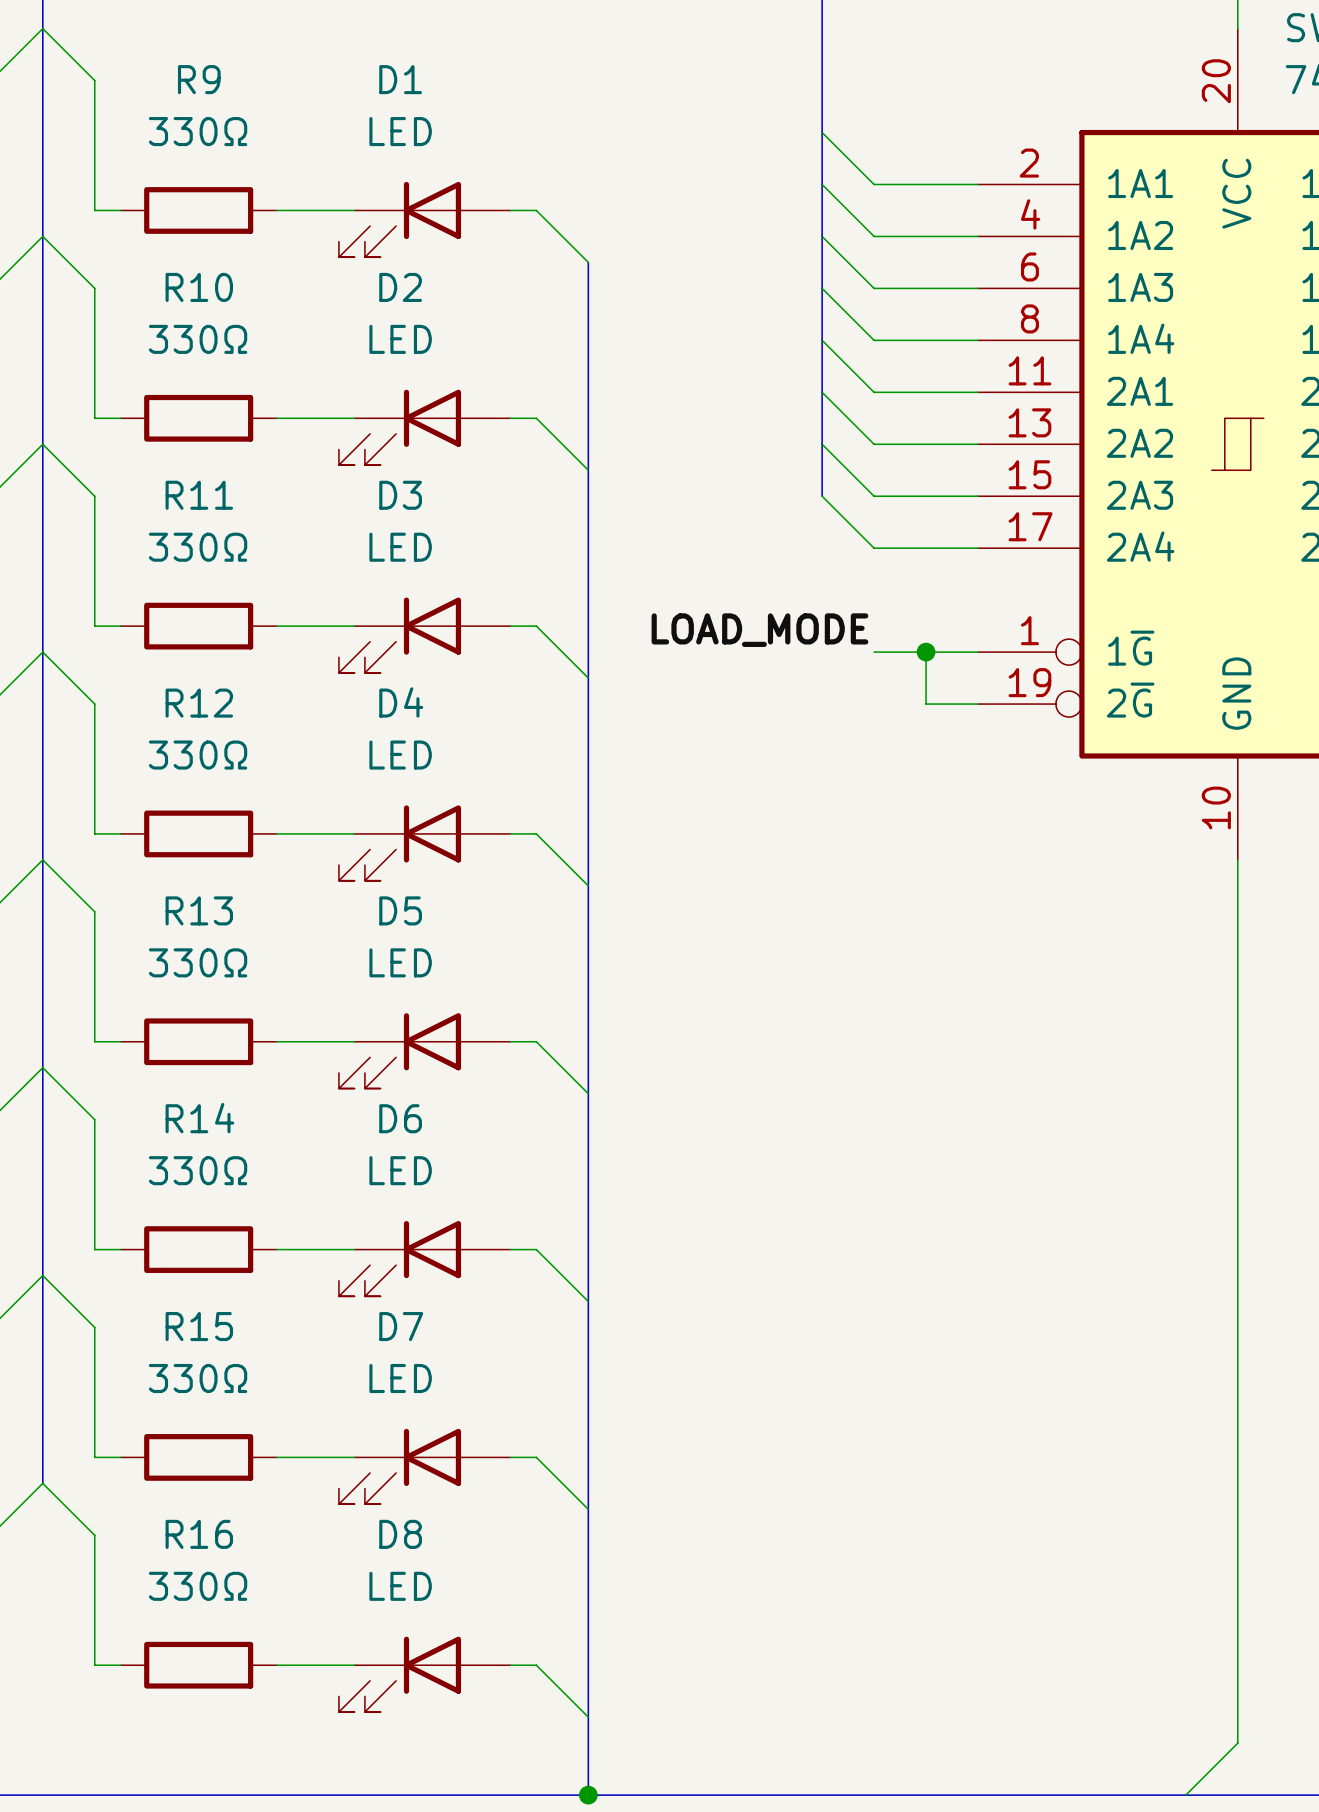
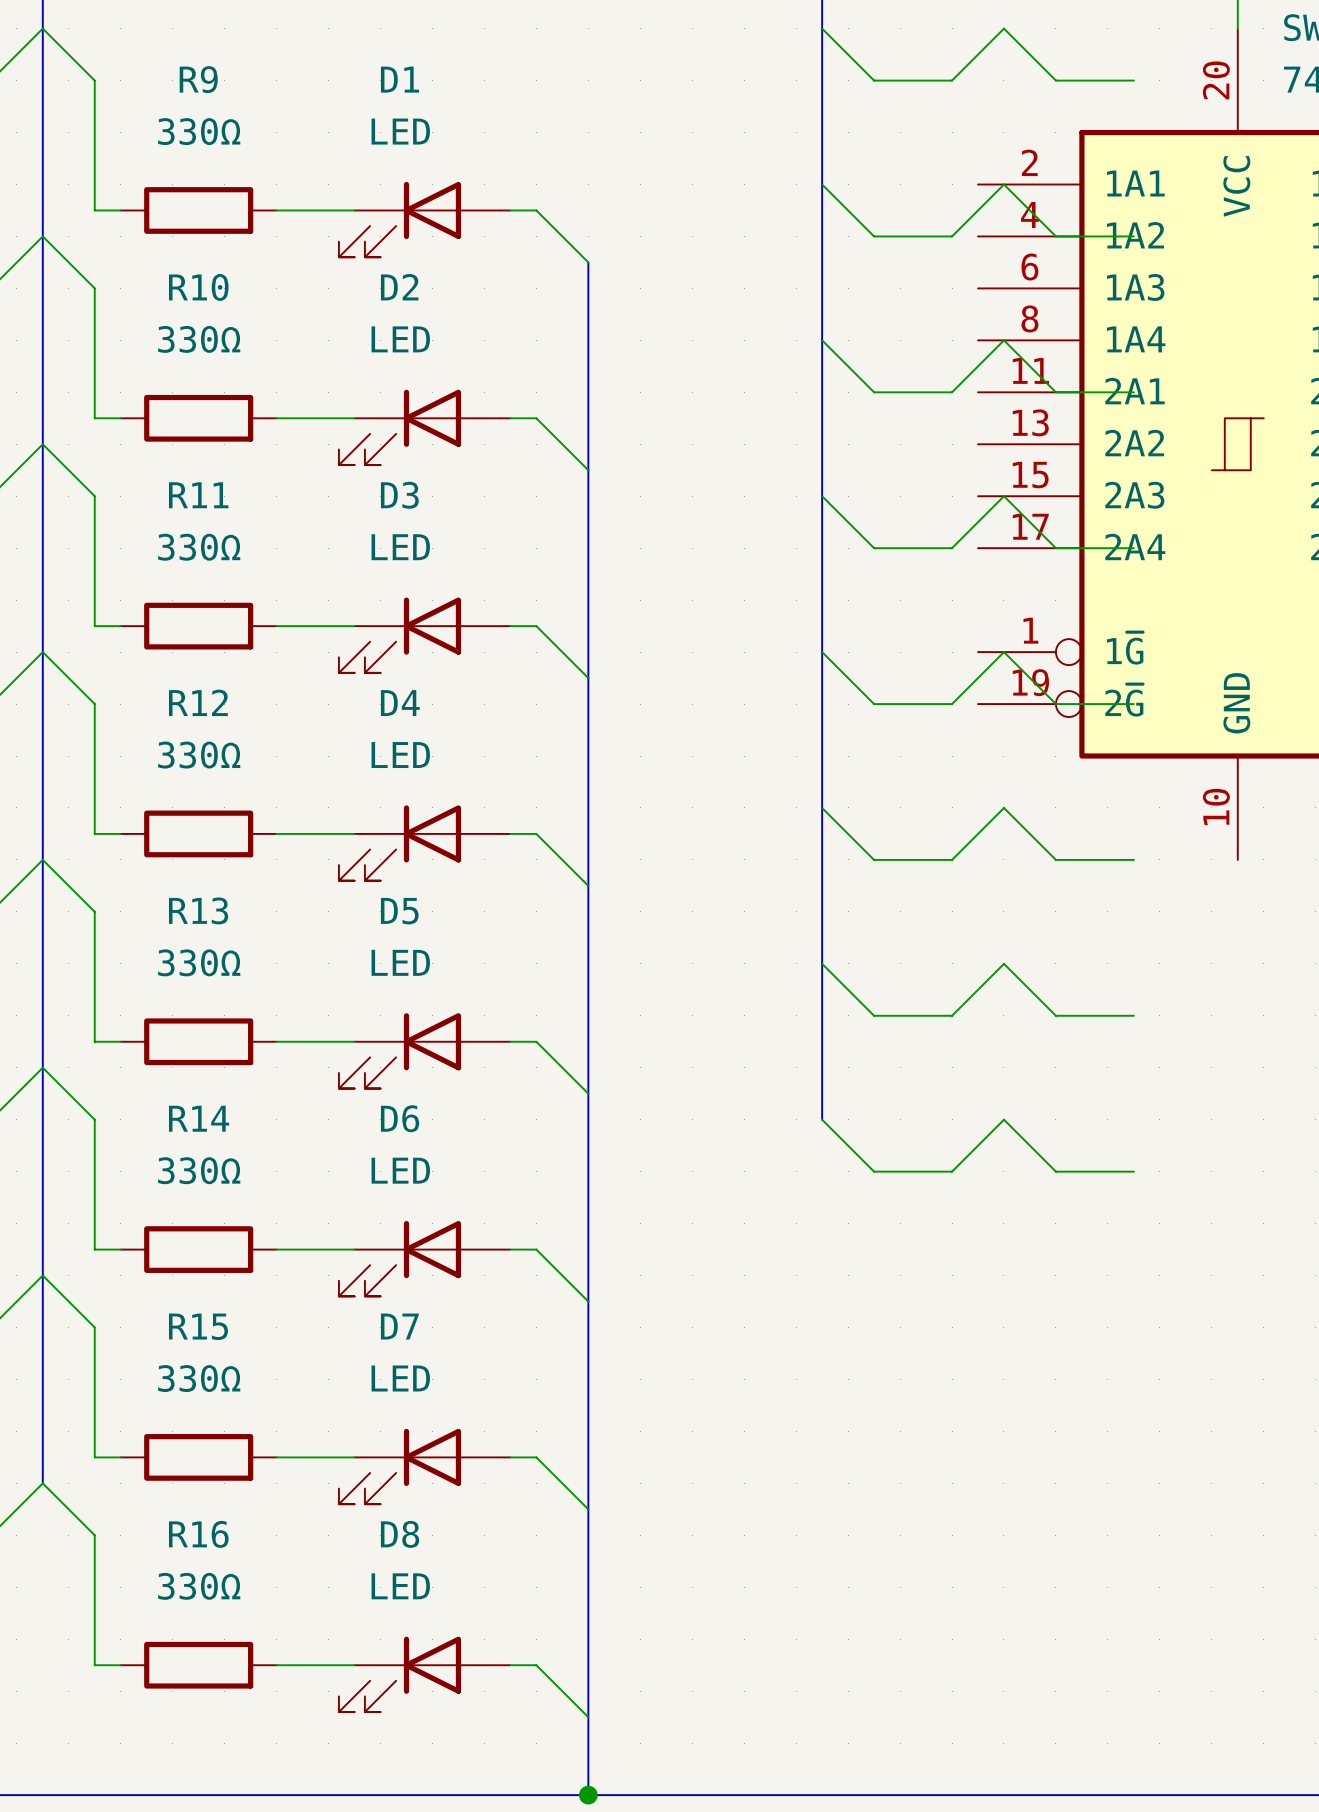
wire: none -> (822, 28) (874, 80) (952, 80) (1003, 28) (1055, 80) (1133, 80)
wire: (822, 132) (874, 184) (978, 184) -> none
wire: (822, 236) (874, 288) (978, 288) -> none
wire: (952, 236) (978, 236) -> (952, 236) (1003, 184) (1055, 236) (1133, 236)
wire: (822, 288) (874, 340) (978, 340) -> none
wire: (822, 392) (874, 444) (978, 444) -> none
wire: (952, 392) (978, 392) -> (952, 392) (1003, 340) (1055, 392) (1133, 392)
wire: (822, 444) (874, 496) (978, 496) -> none
bus: none -> (822, 496) (822, 1119)
wire: (952, 548) (978, 548) -> (952, 548) (1003, 496) (1055, 548) (1133, 548)
label: LOAD_MODE (759, 630) -> none
wire: (874, 652) (978, 652) -> none
wire: (926, 652) (926, 704) -> (822, 652) (874, 704) (926, 704)
junction: (926, 652) -> none
wire: (952, 704) (978, 704) -> (952, 704) (1003, 652) (1055, 704) (1133, 704)
wire: none -> (822, 807) (874, 859) (952, 859) (1003, 807) (1055, 859) (1133, 859)
wire: (1237, 859) (1237, 1743) (1185, 1795) -> none
wire: none -> (822, 963) (874, 1015) (952, 1015) (1003, 963) (1055, 1015) (1133, 1015)
wire: none -> (822, 1119) (874, 1171) (952, 1171) (1003, 1119) (1055, 1171) (1133, 1171)

